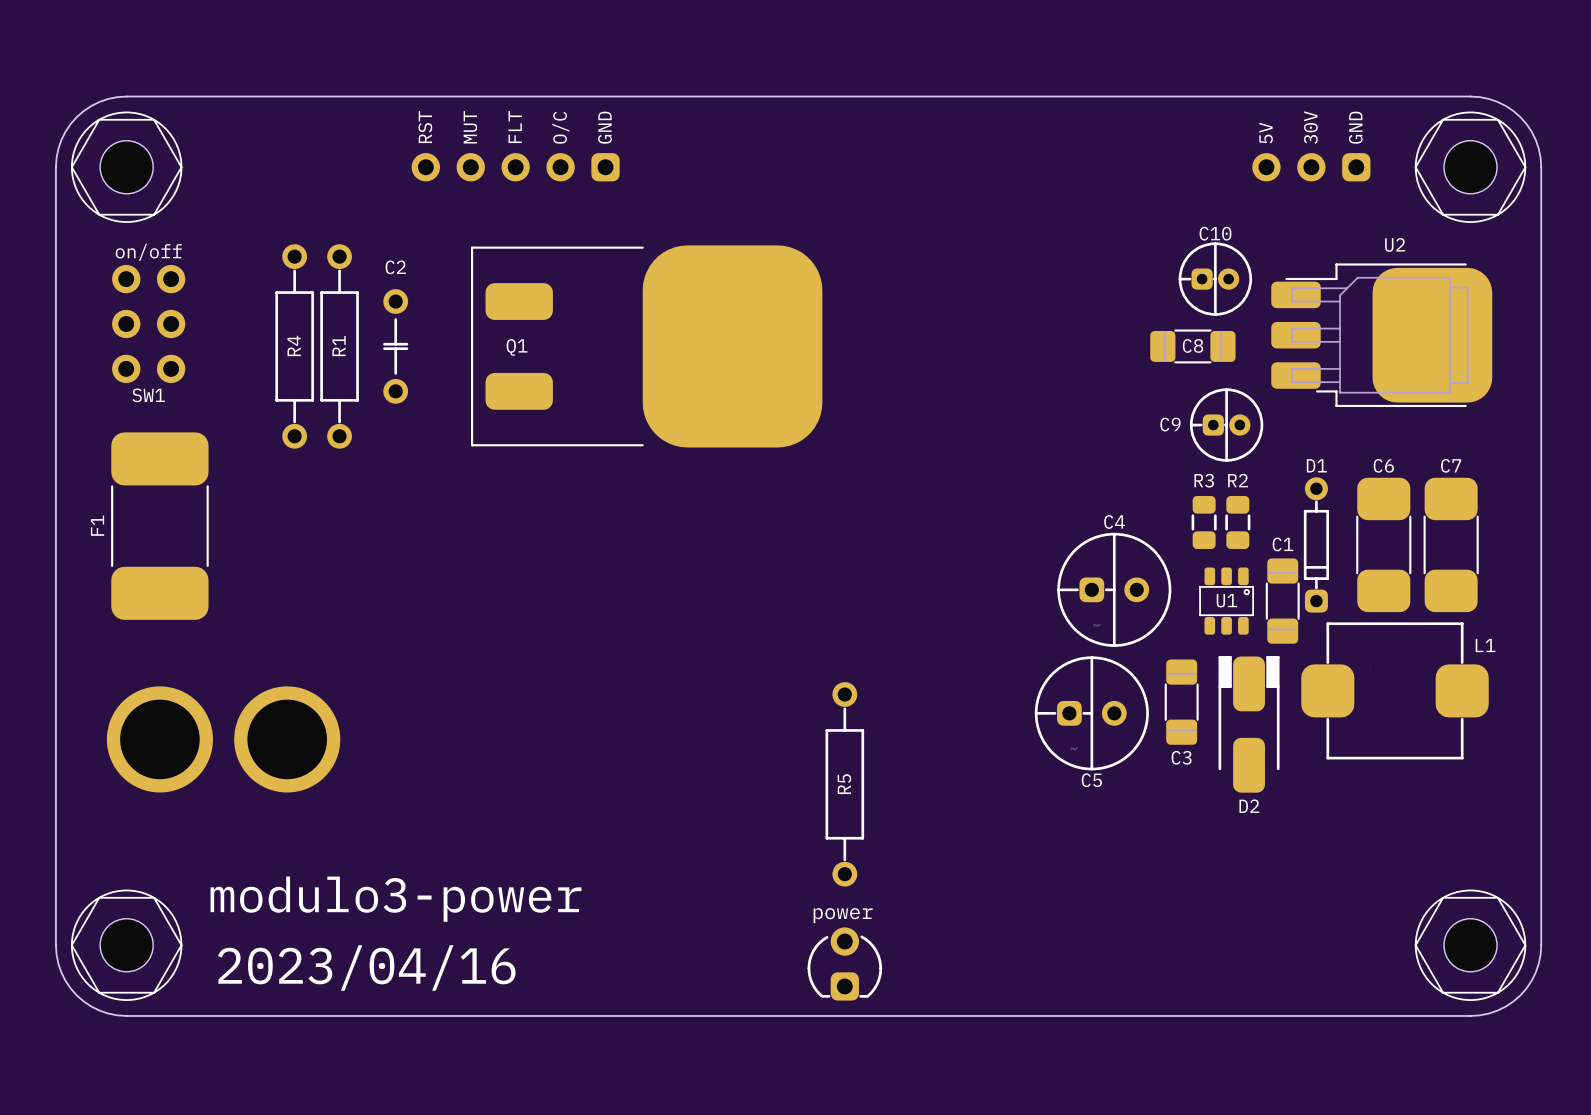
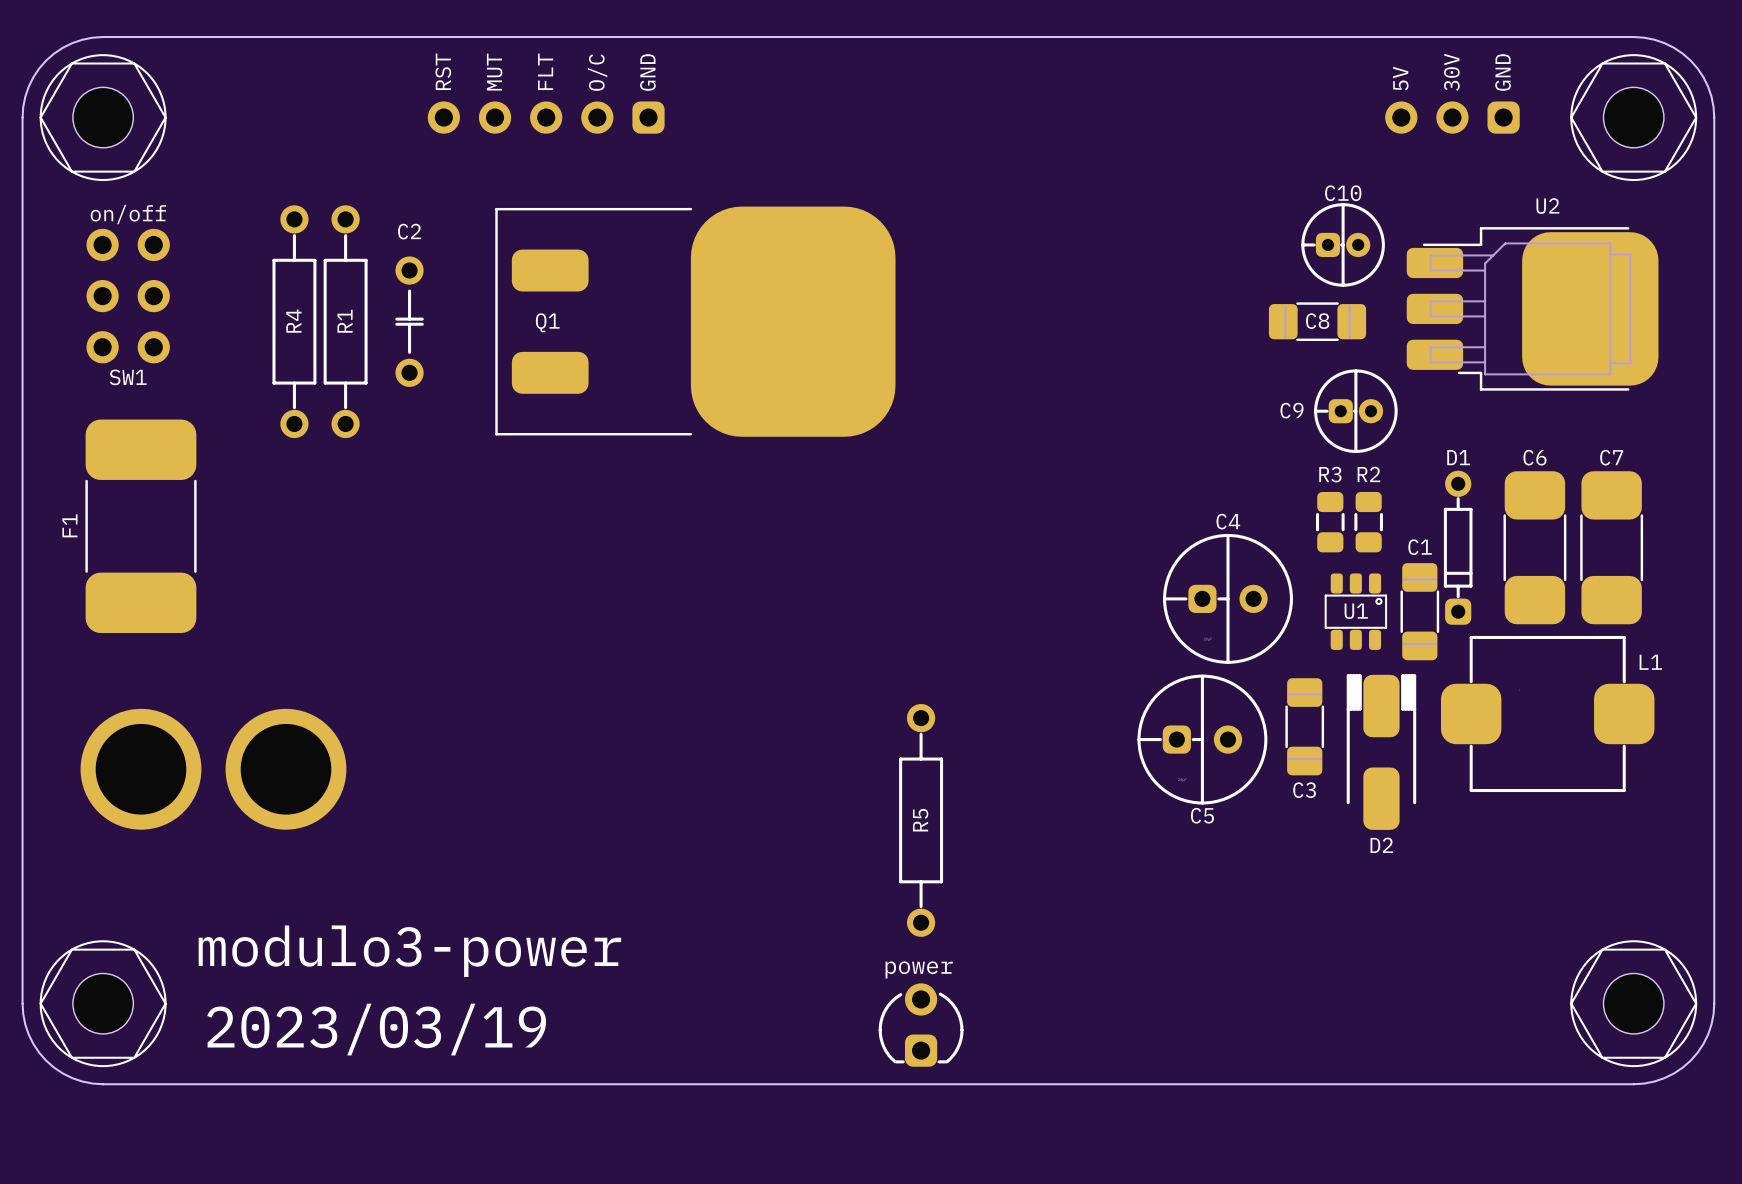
text: 2023/04/16 (366, 967) -> 2023/03/19 (376, 1029)

